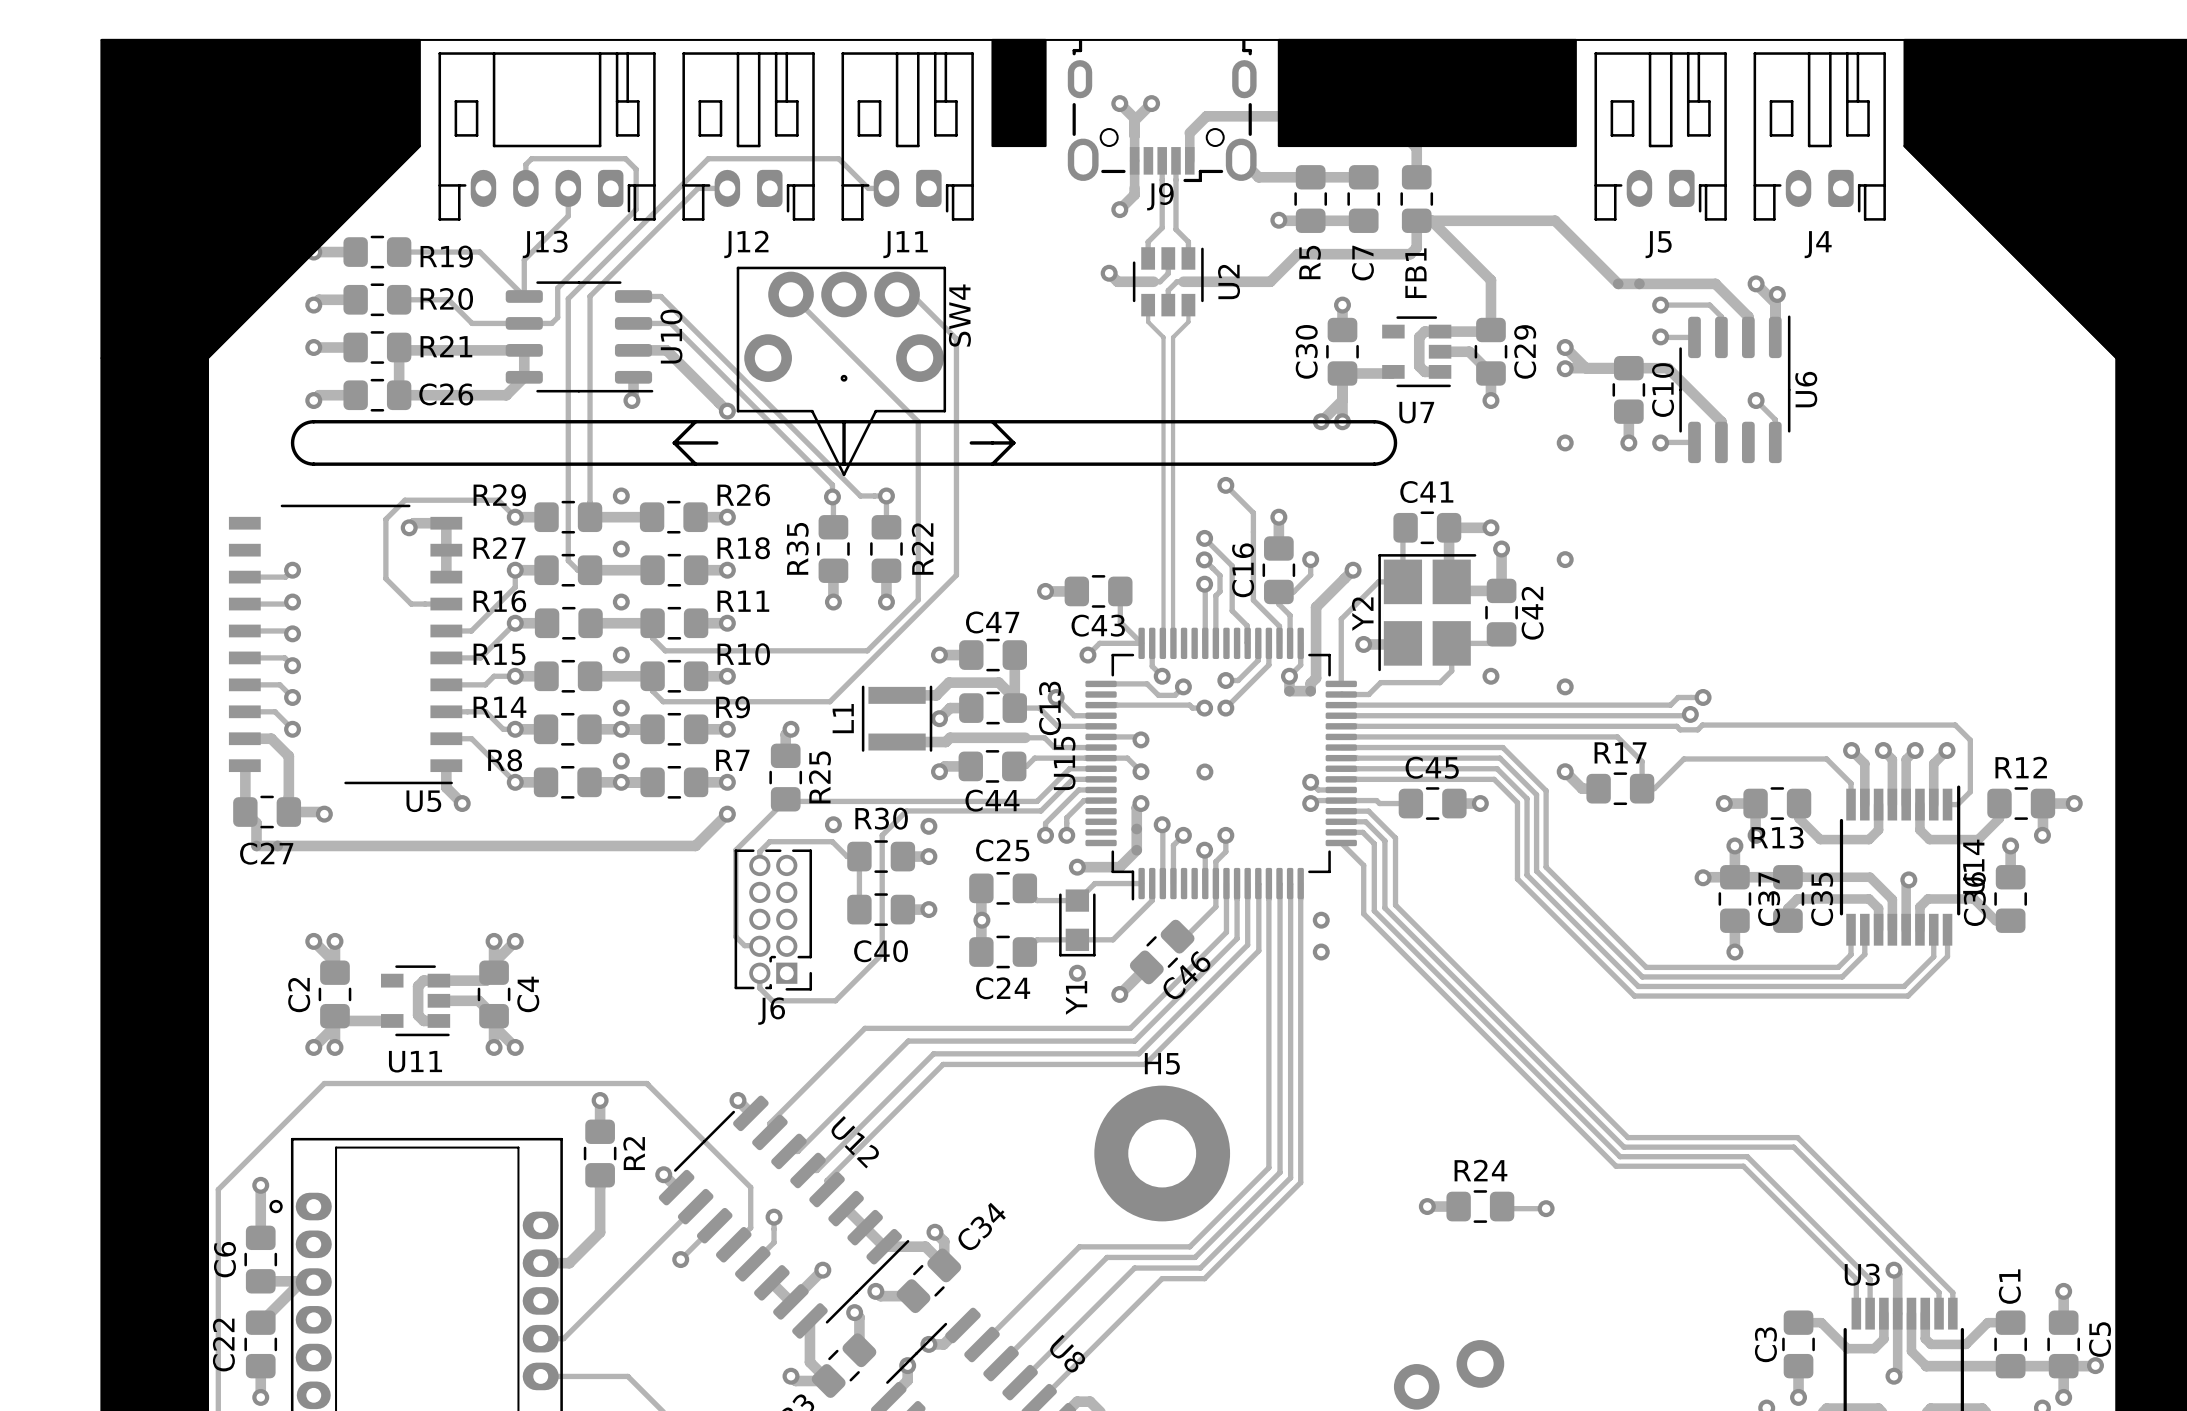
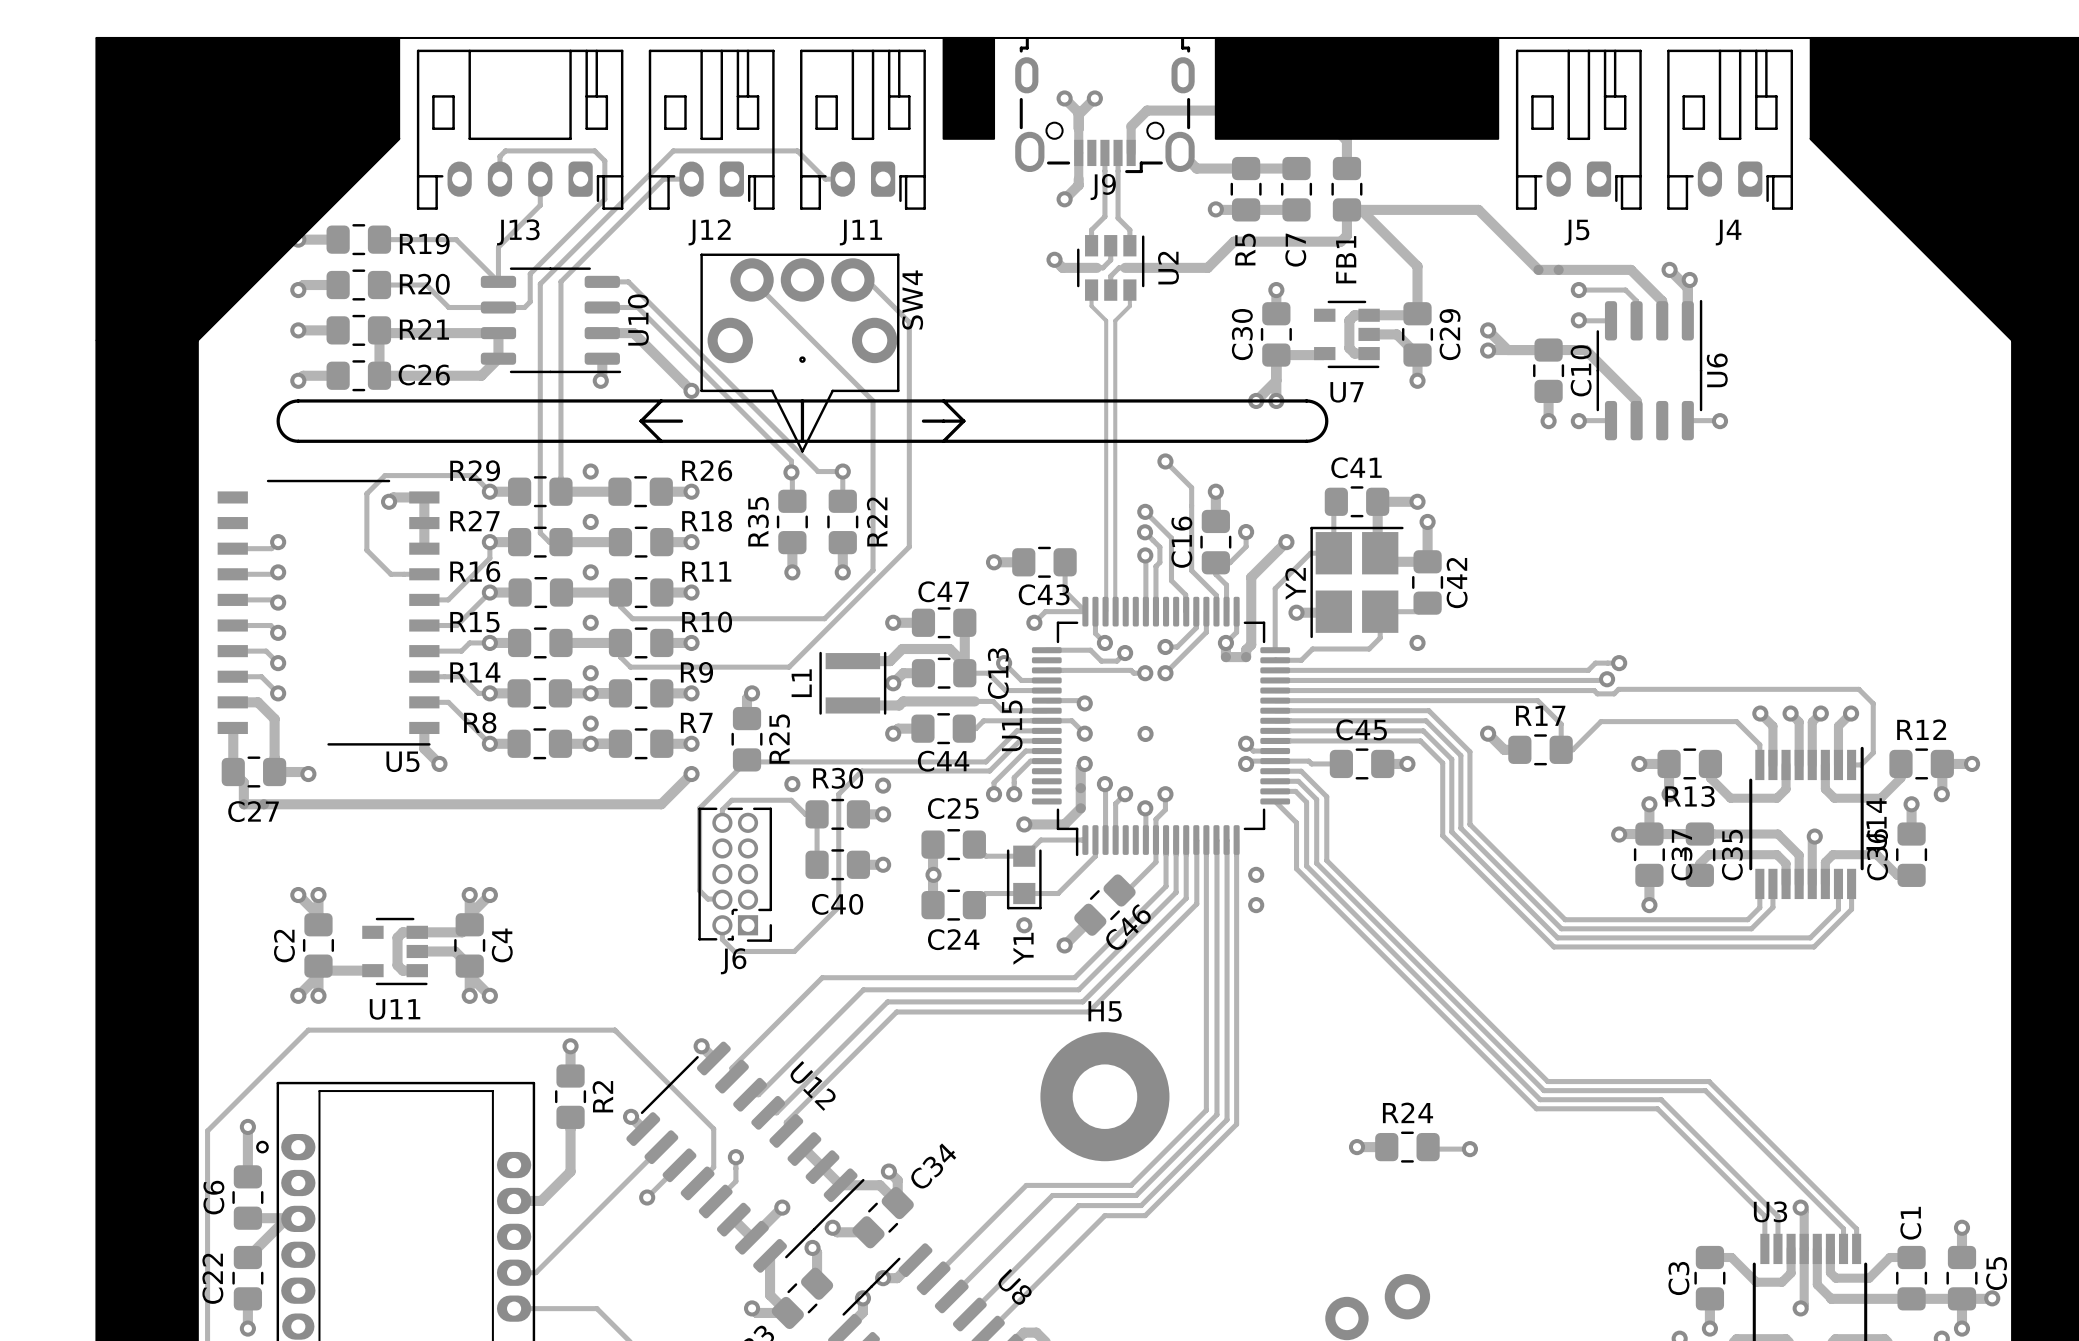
track: (1756, 400) (1775, 419) (1775, 442) -> (1720, 421) (1687, 420)
via position: (1756, 400) -> (1720, 421)
via: (1565, 442) -> none
via: (1565, 559) -> none
via: (1565, 686) -> none

